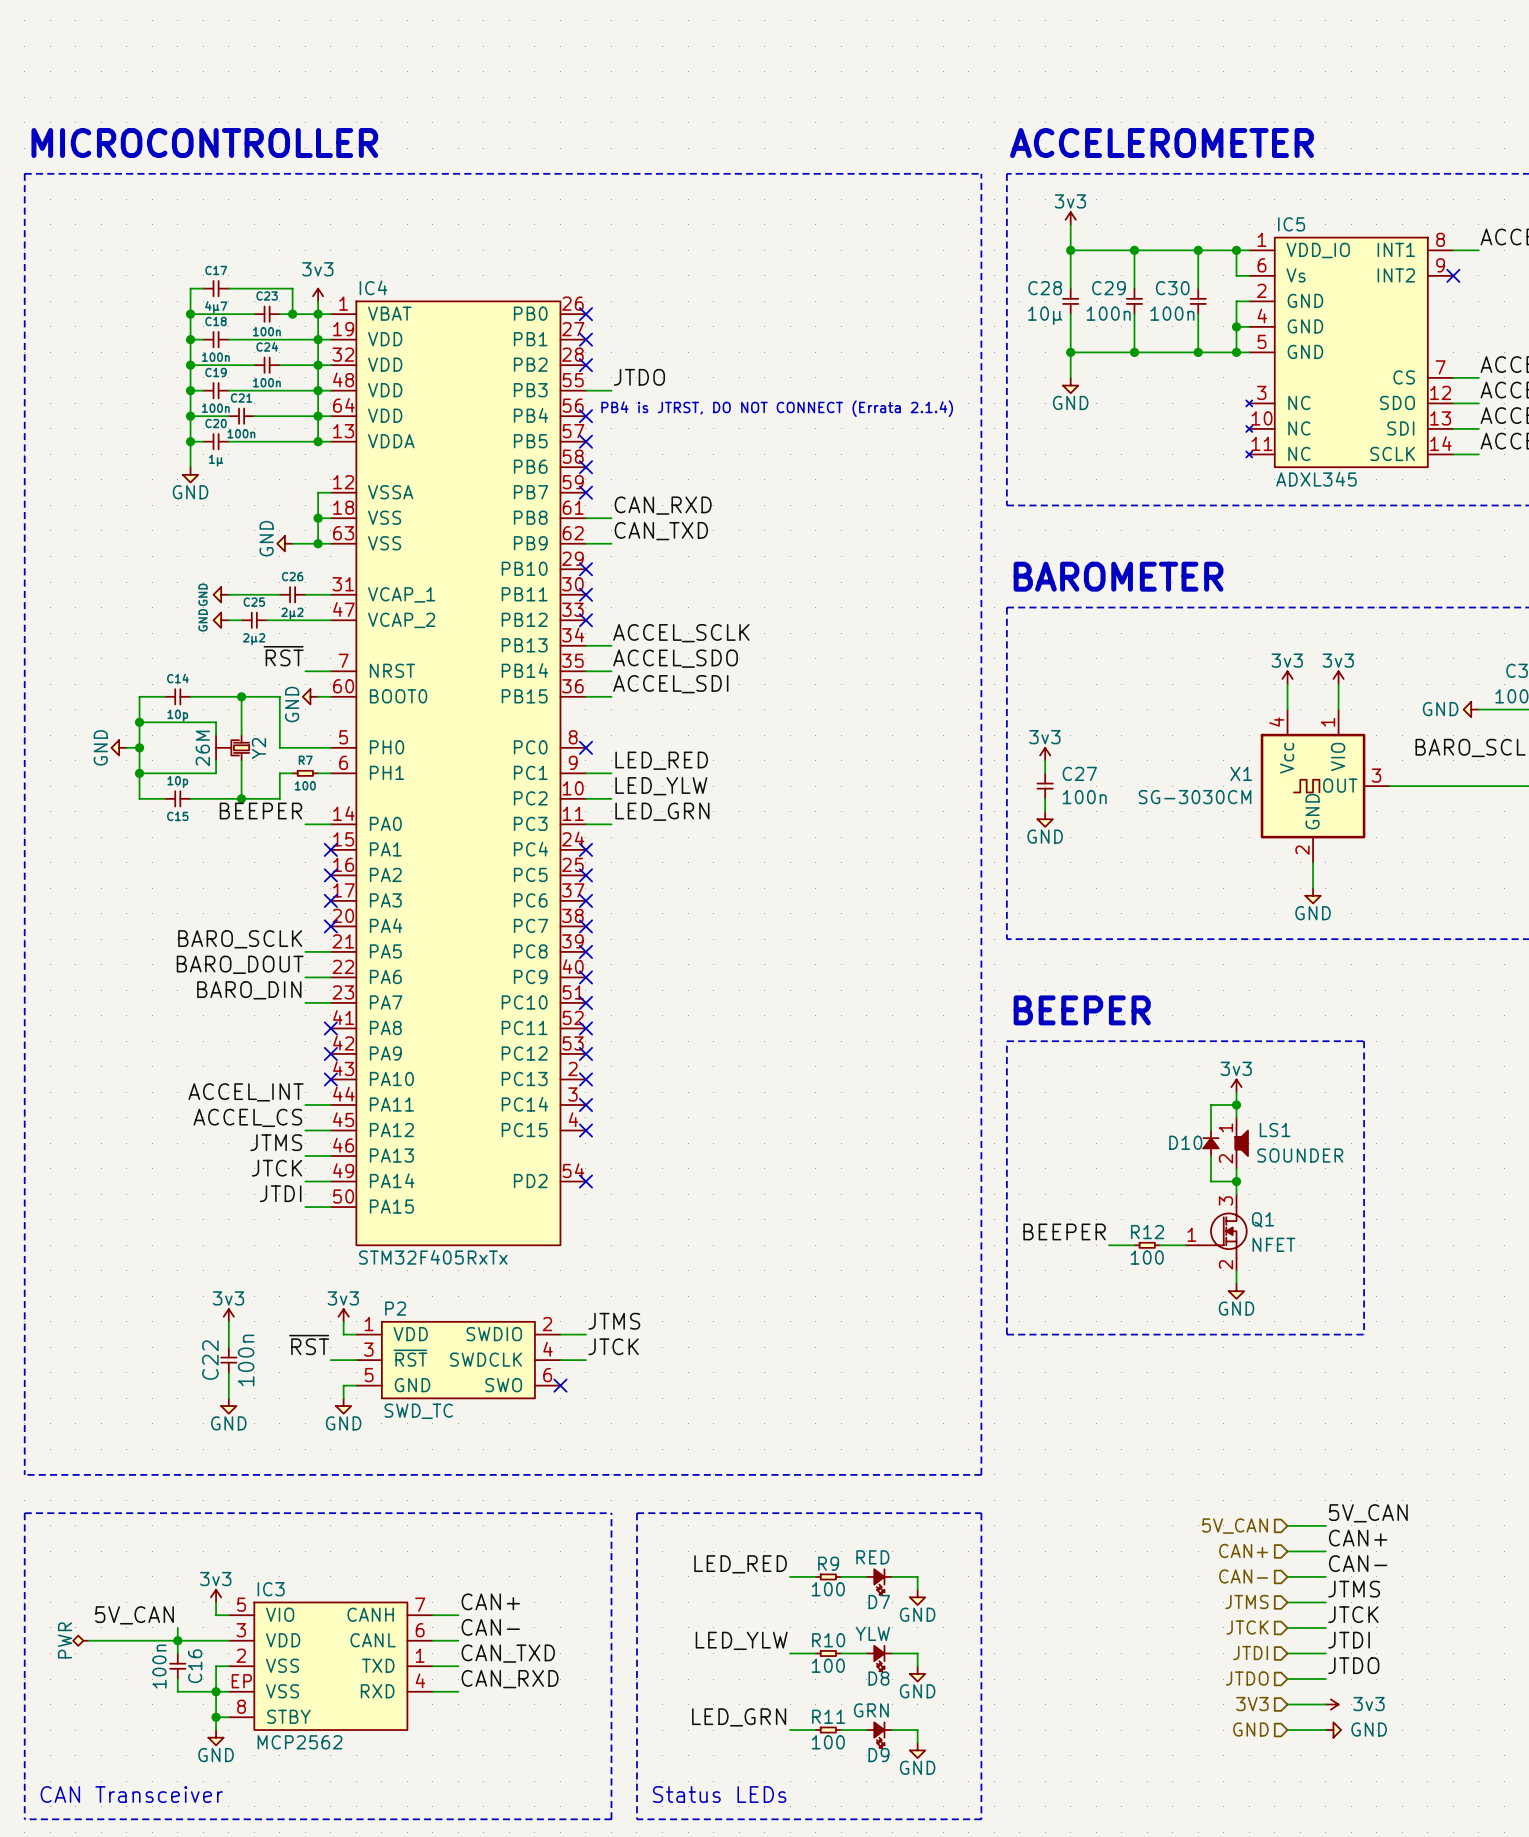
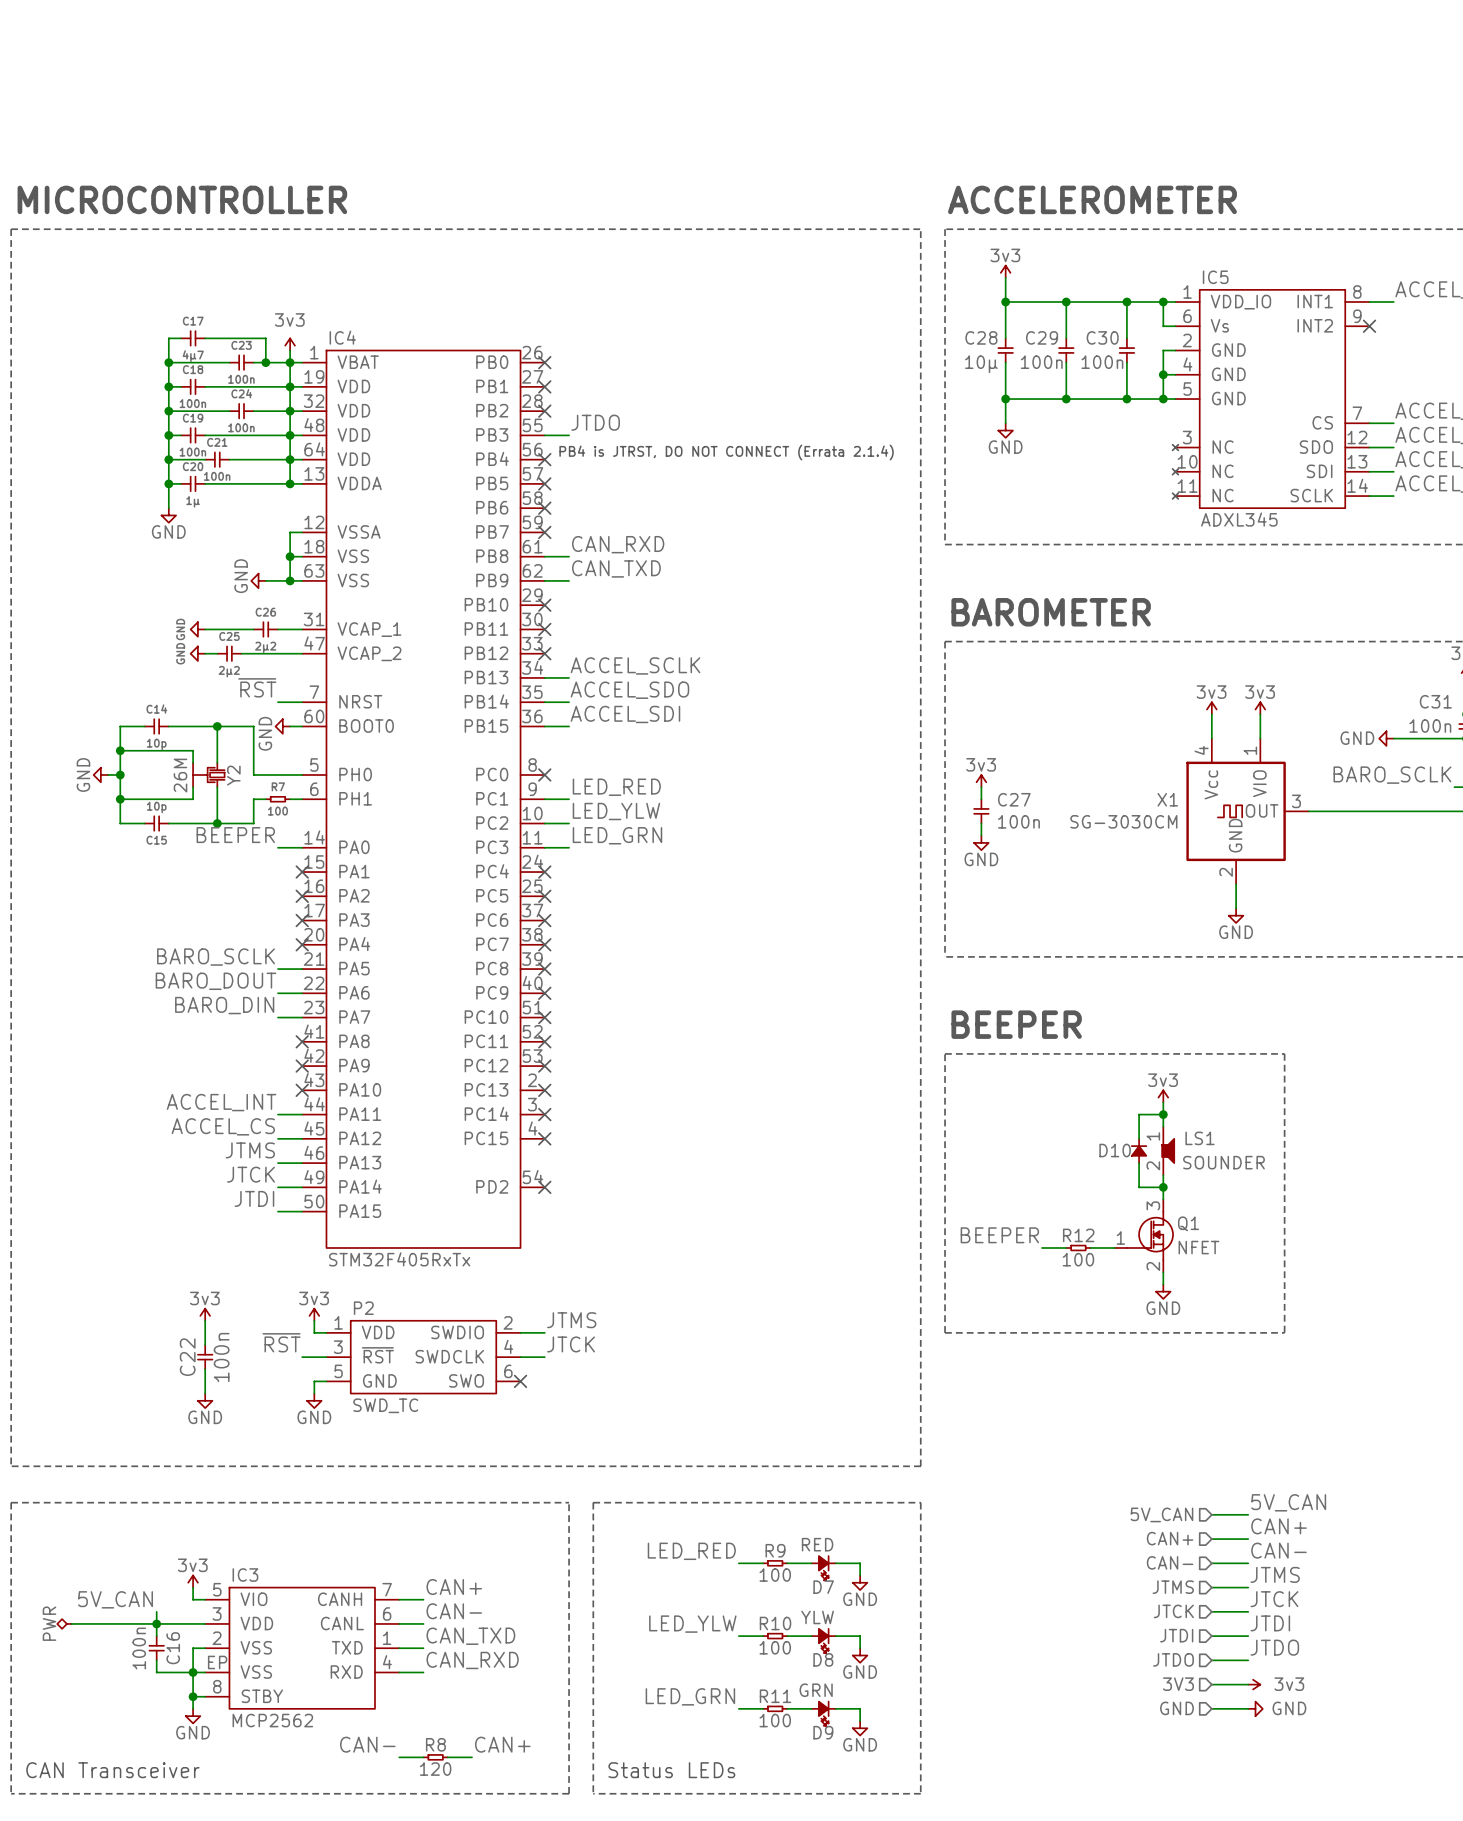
label: none -> CAN- (367, 1744)
label: none -> CAN+ (502, 1744)
wire: none -> (399, 1757) (423, 1757)
R8: none -> 120 (435, 1757)
wire: none -> (447, 1757) (472, 1757)

